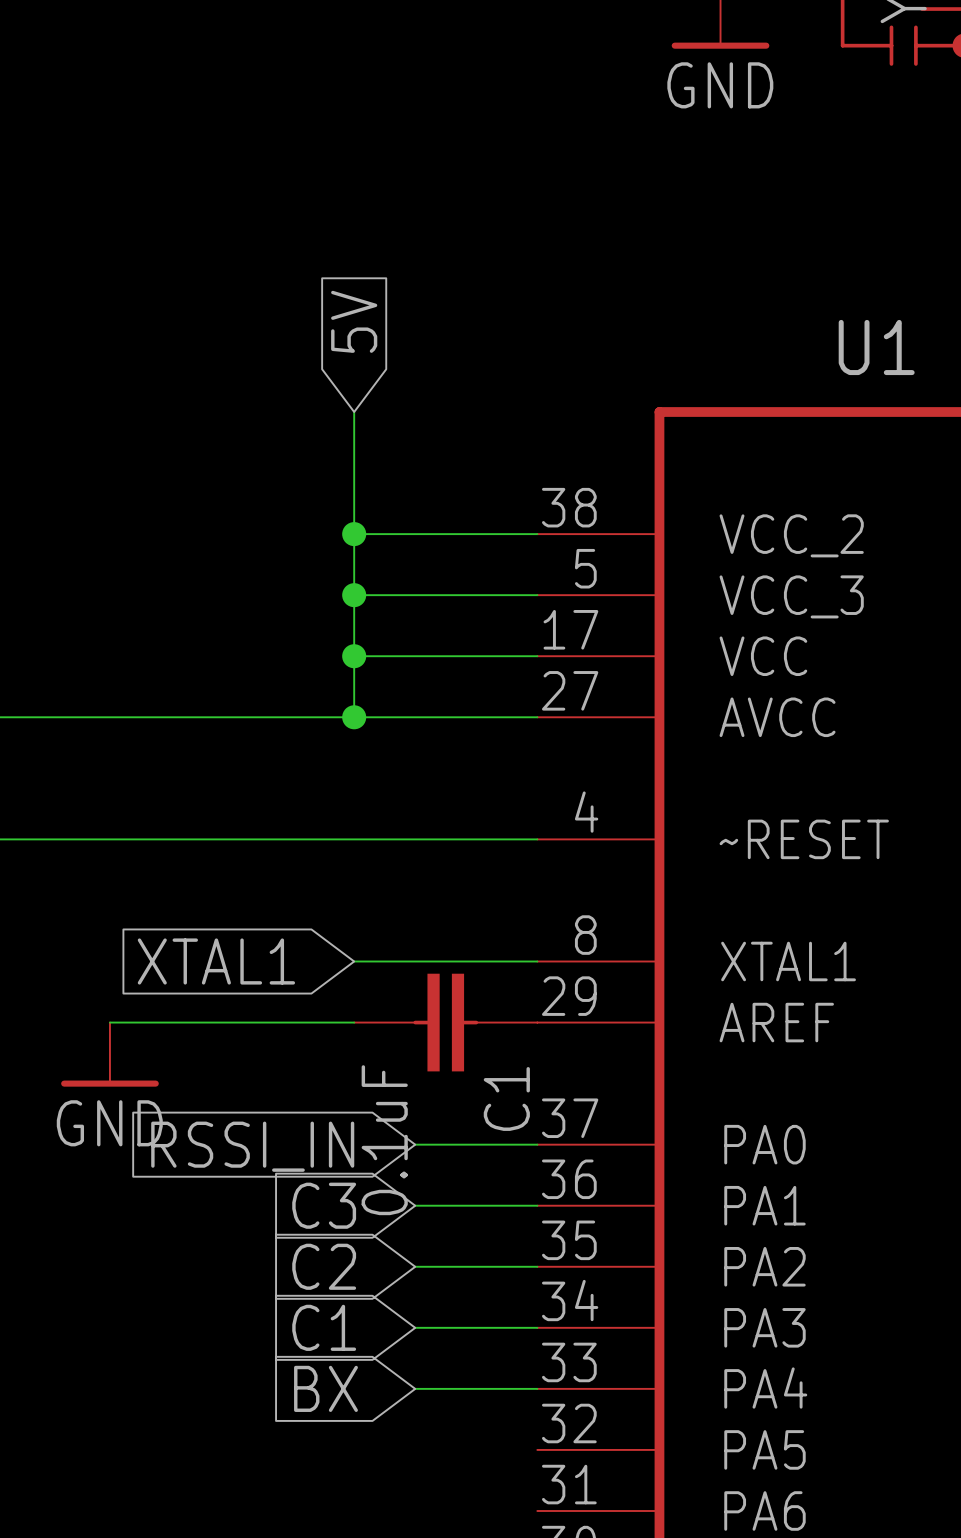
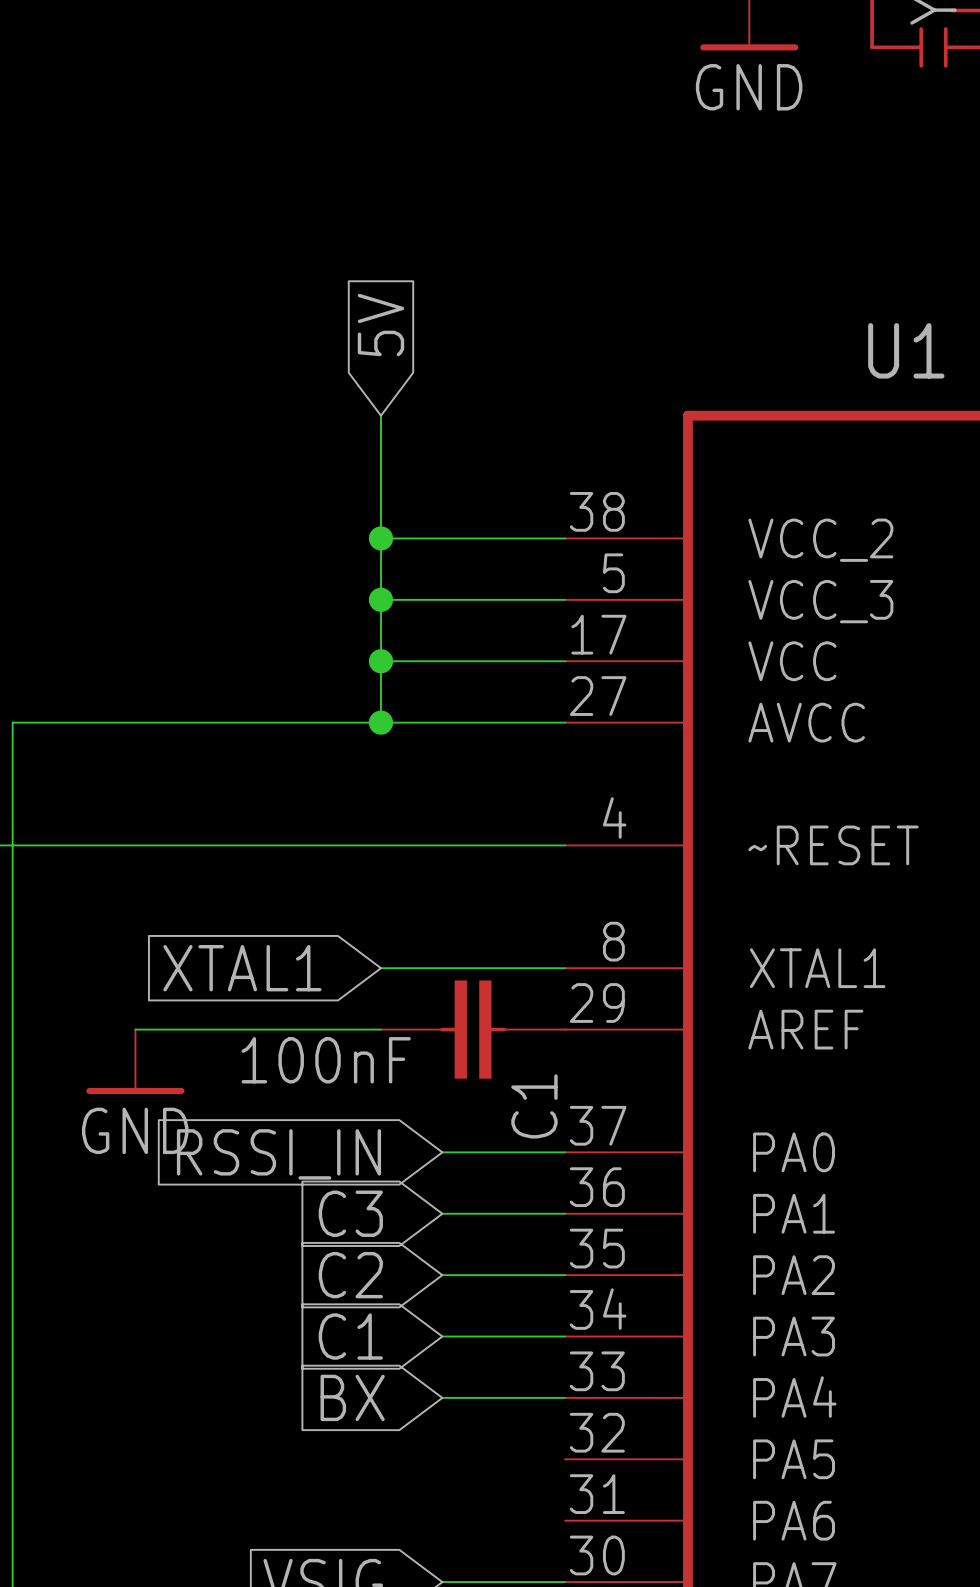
C1 value: 0.1uF (384, 1140) -> 100nF (326, 1060)

